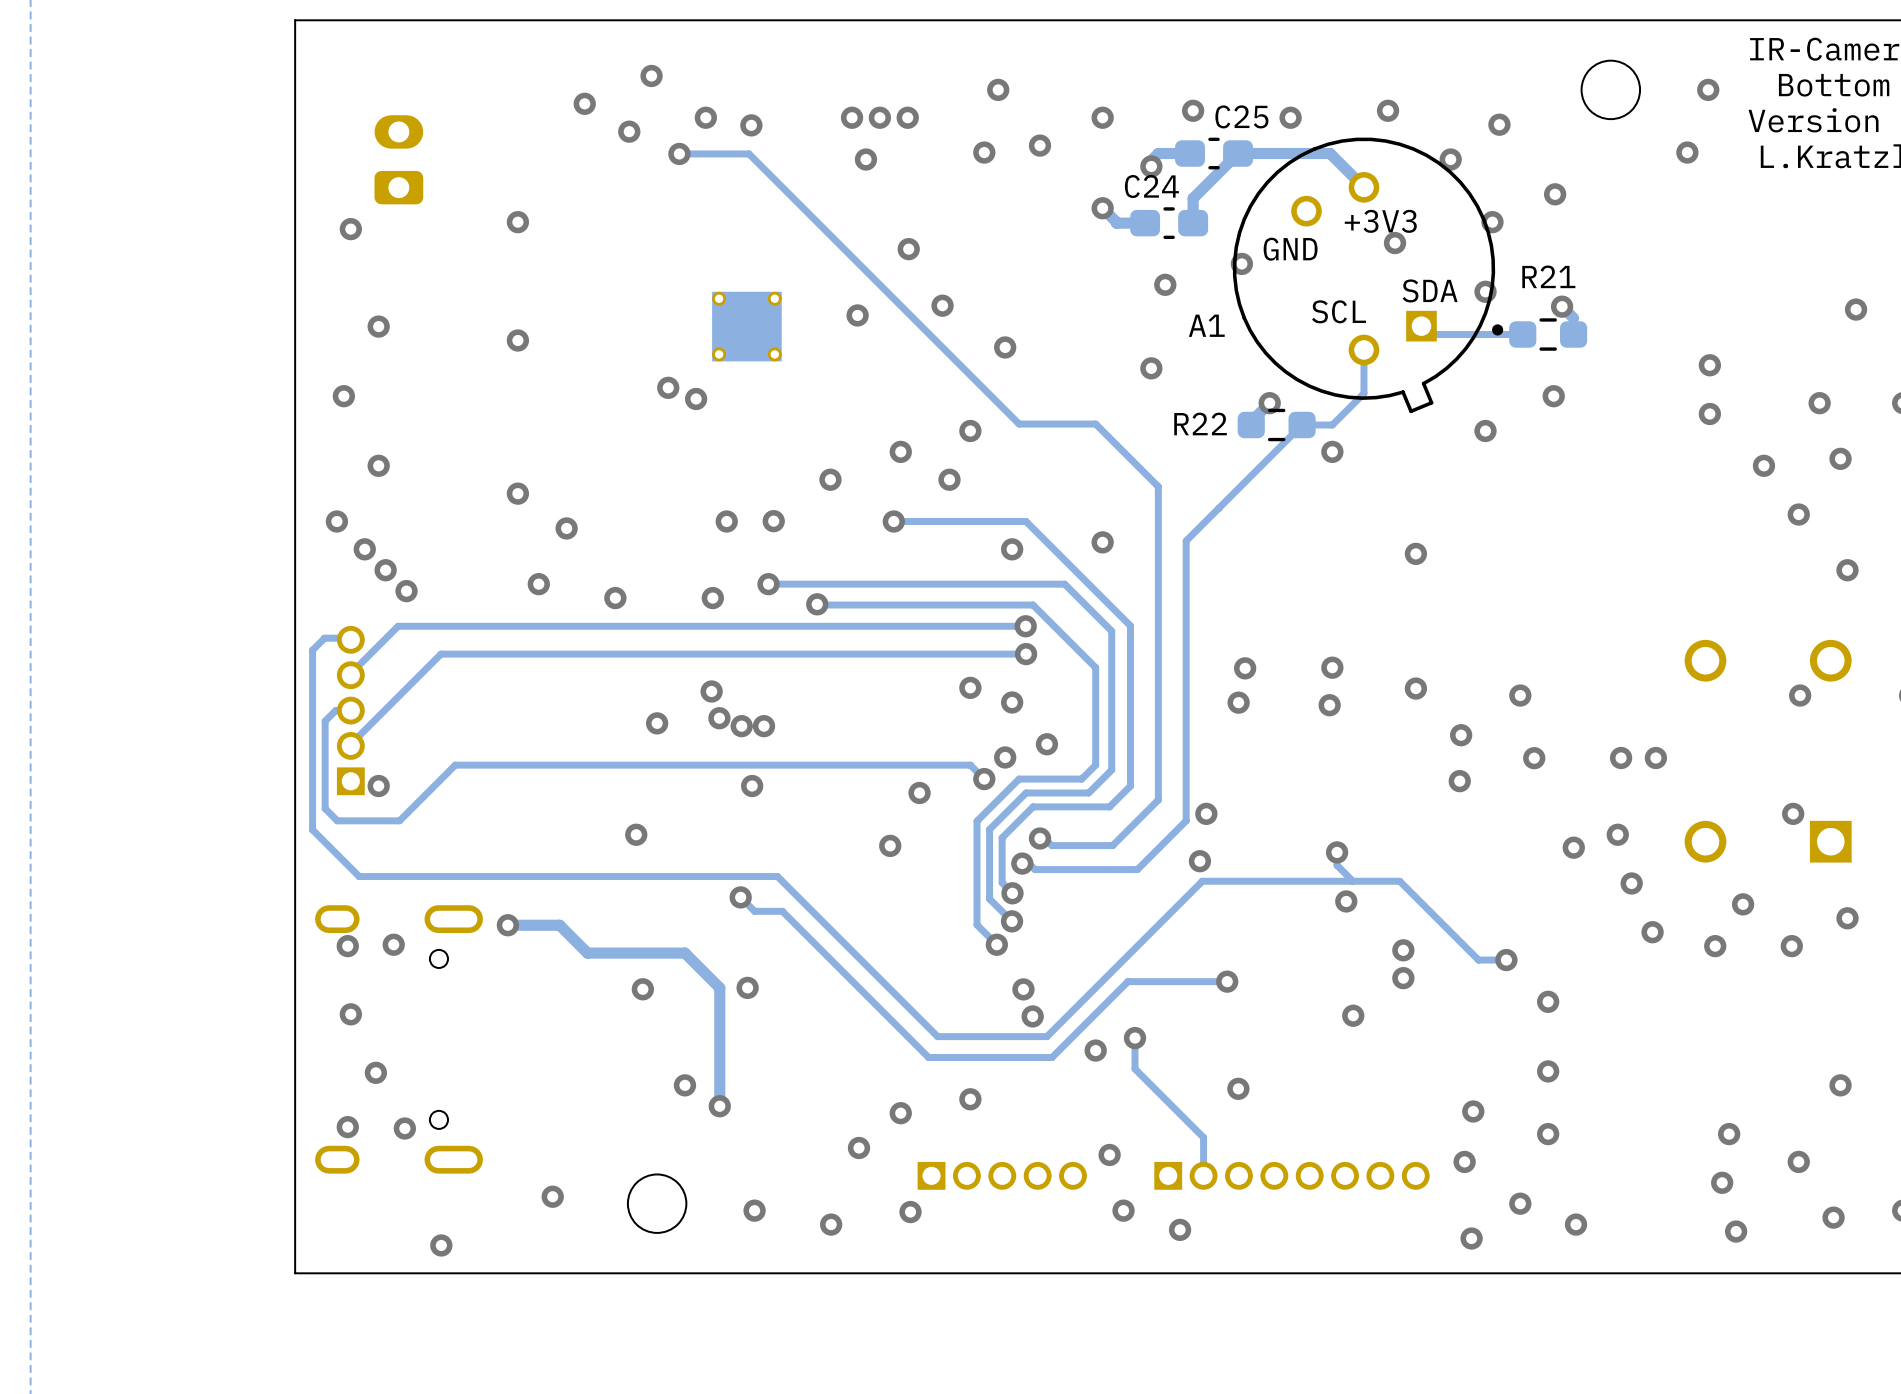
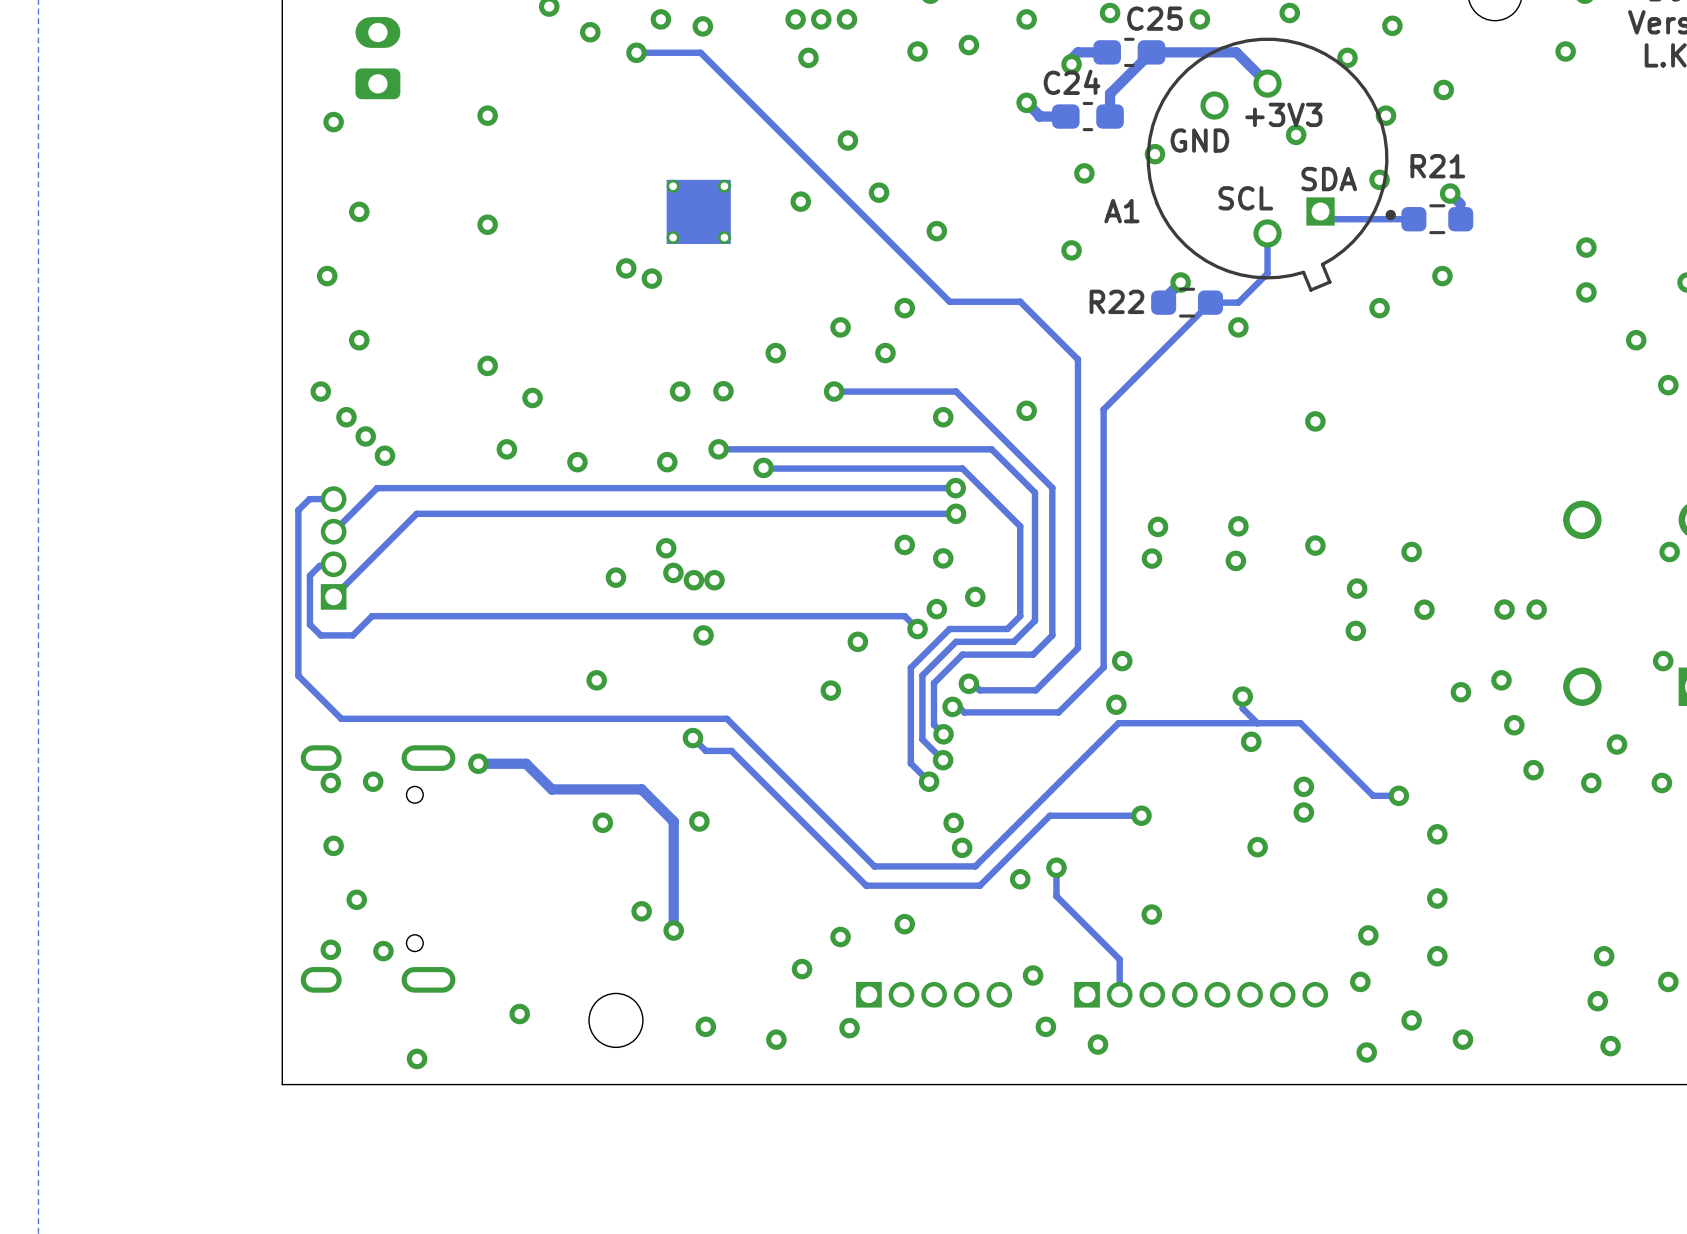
part footprint: [336, 625, 365, 796] -> [320, 486, 347, 610]
track: (455, 765) (399, 820) (337, 820) (325, 808) (325, 774) -> (429, 616) (372, 616) (352, 635) (320, 635) (309, 624)
via: (378, 786) -> none

